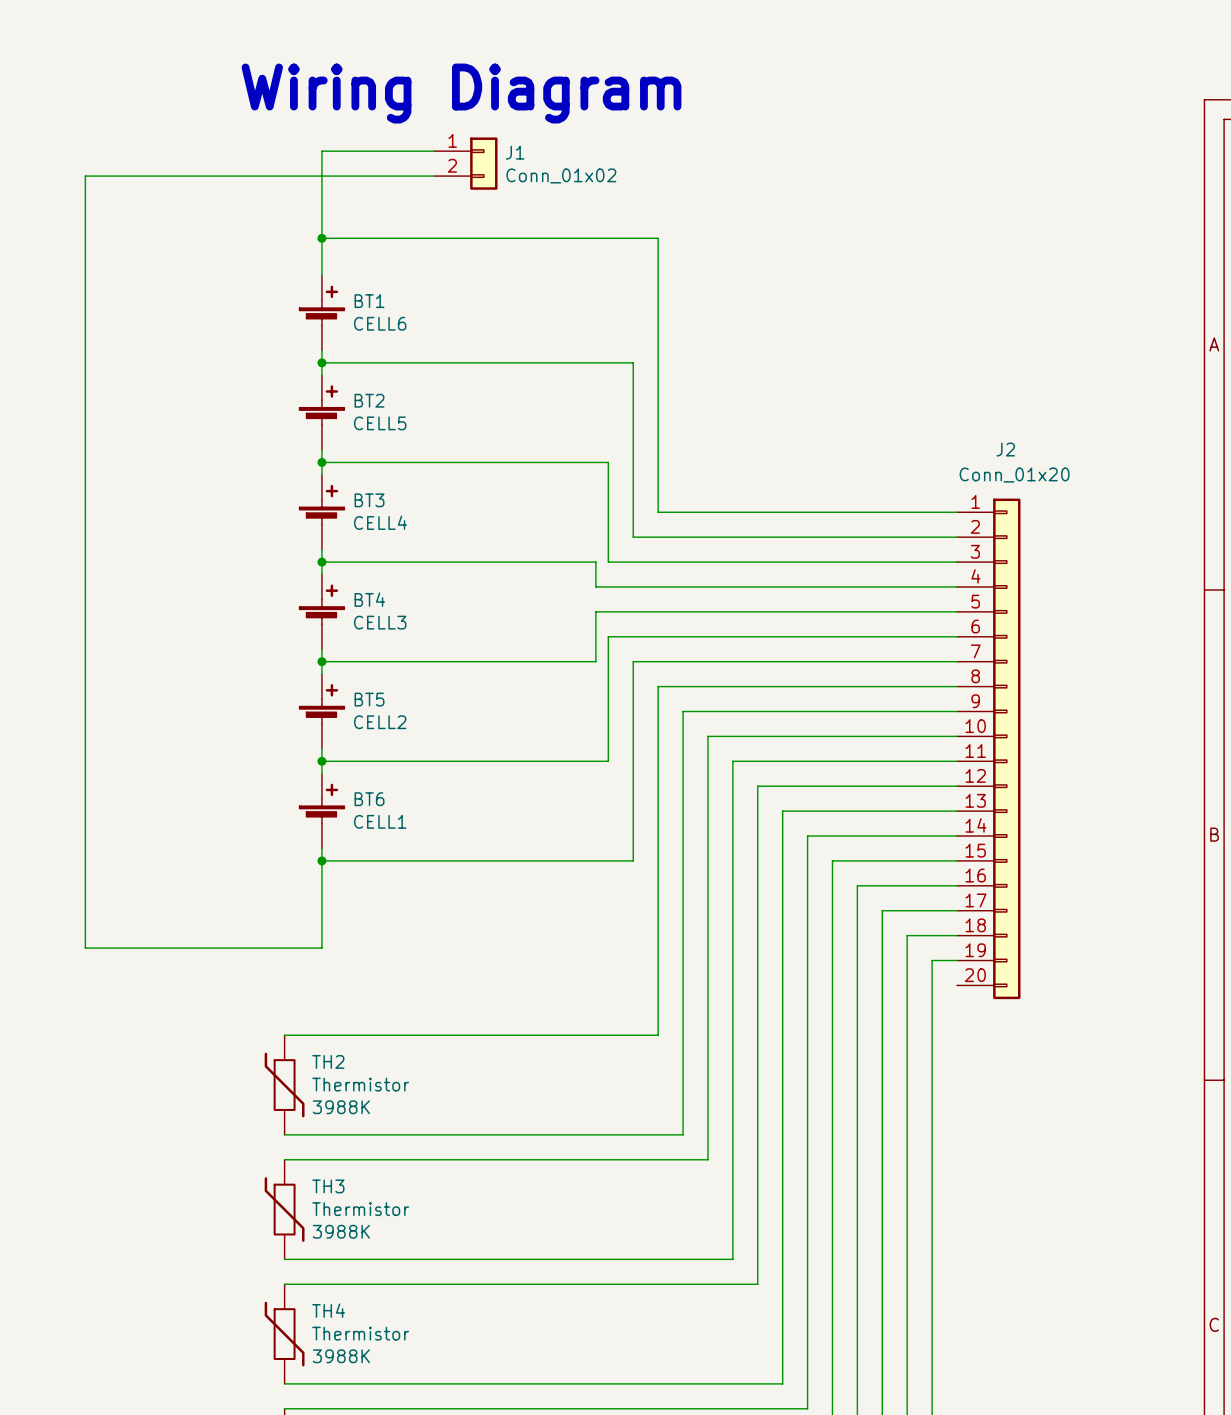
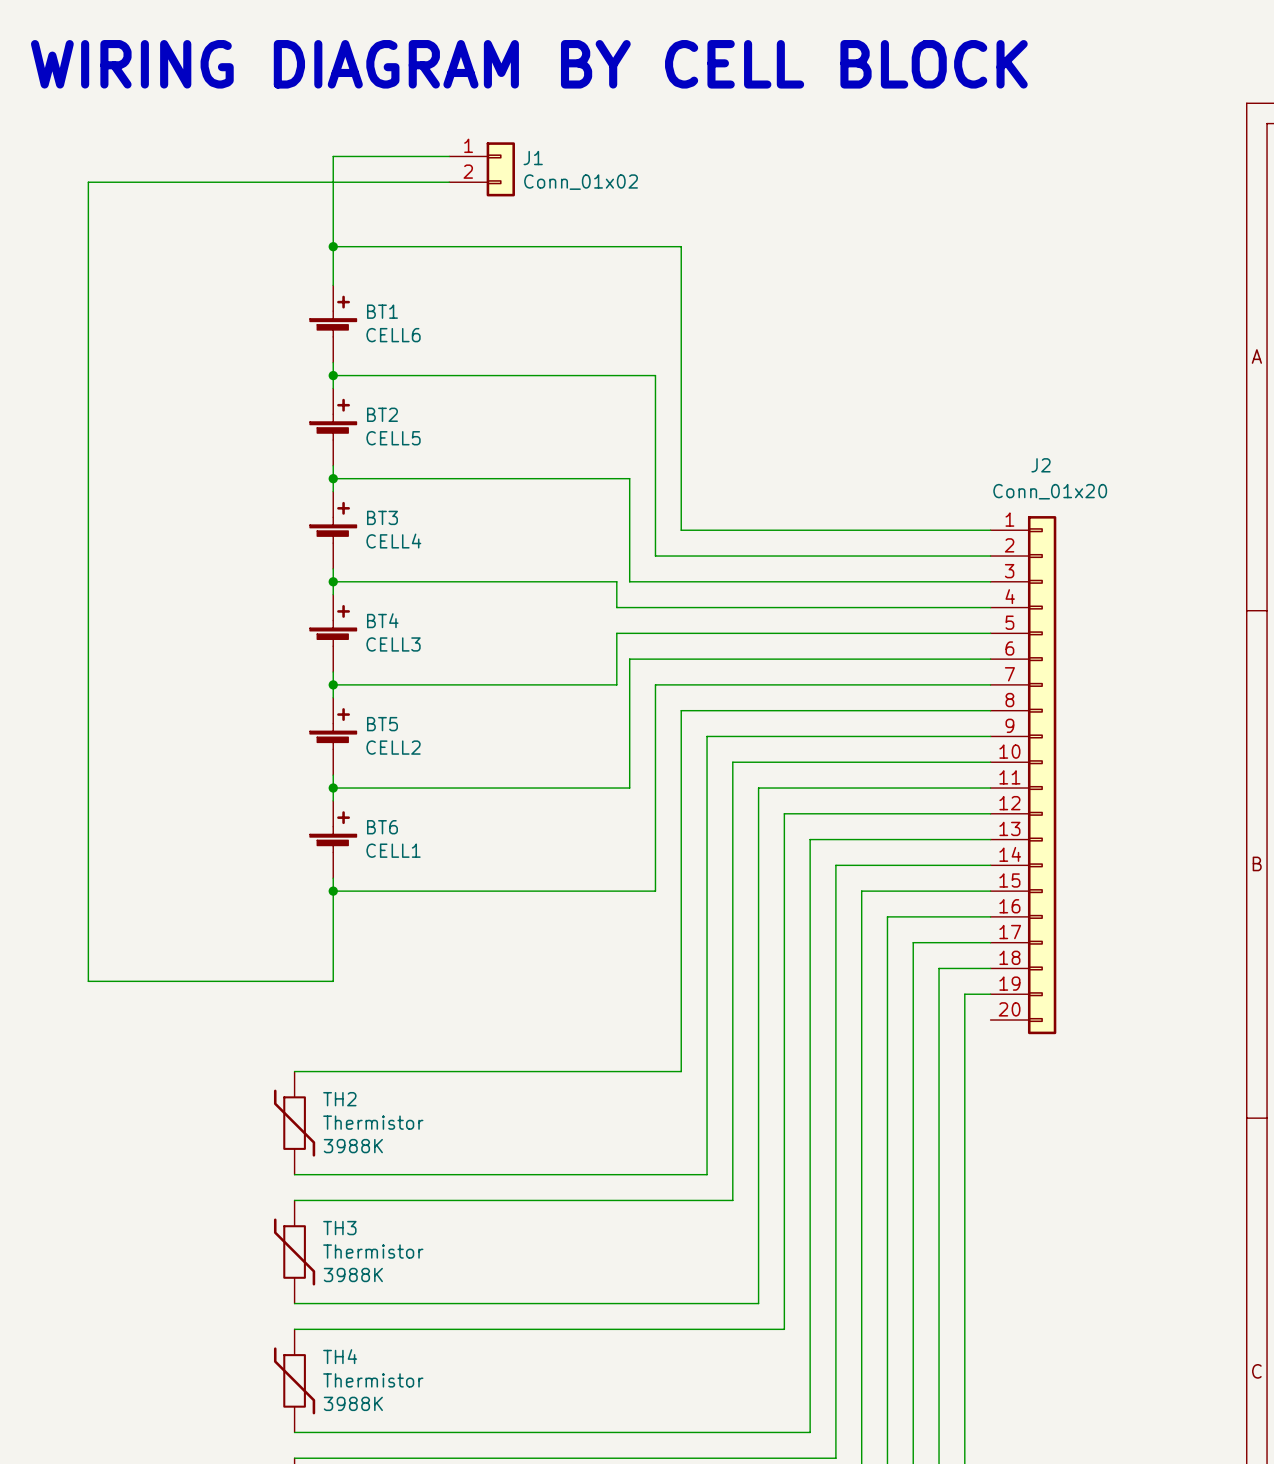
text: none -> WIRING DIAGRAM BY CELL BLOCK (529, 64)
text: Wiring Diagram (461, 93) -> none

